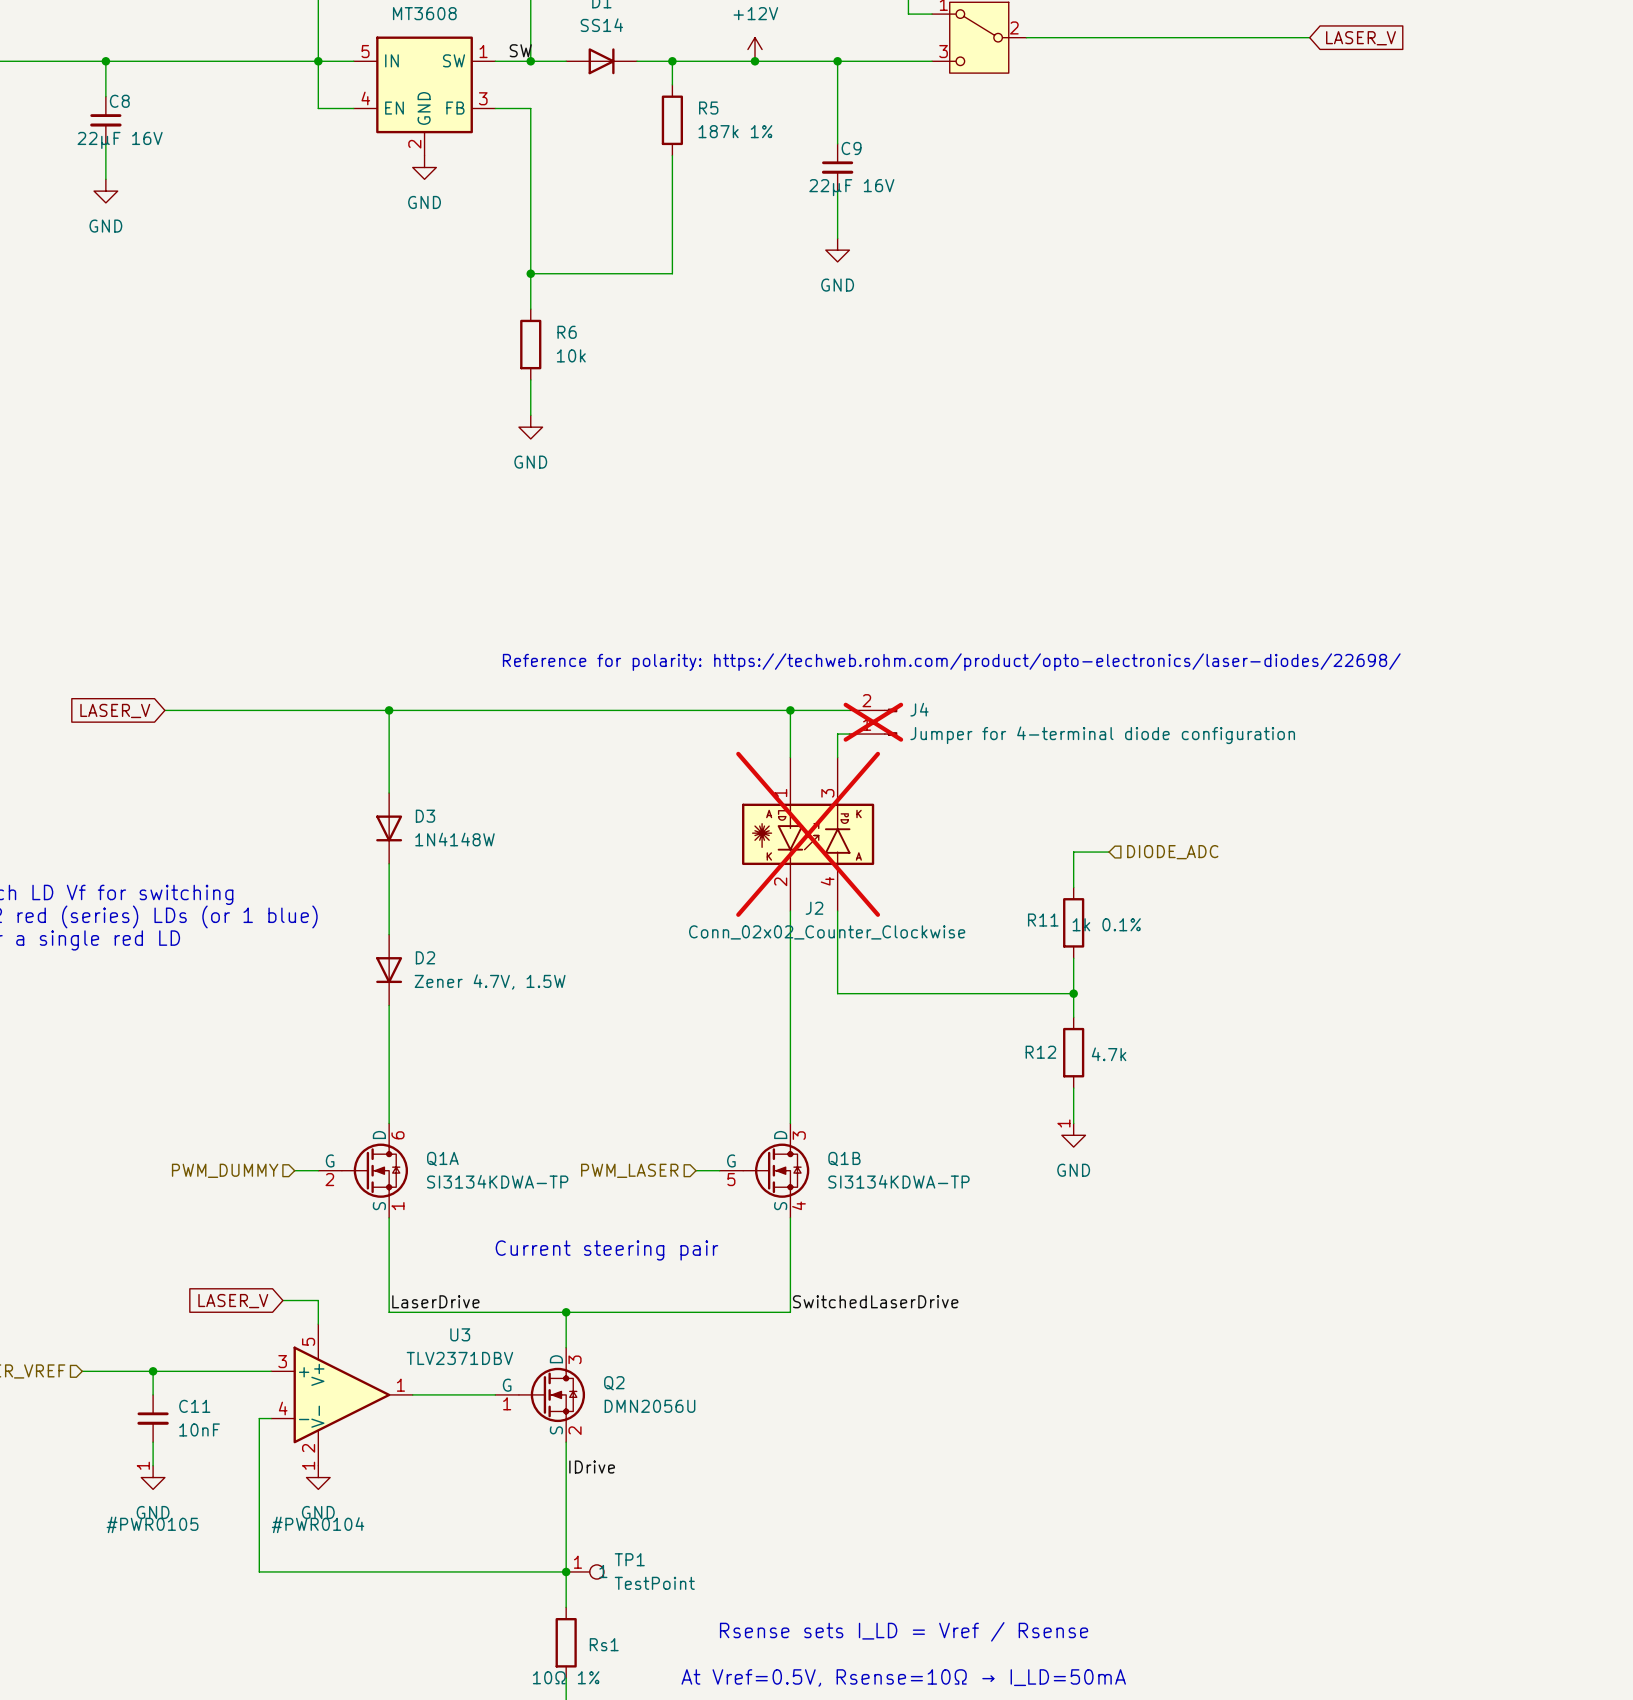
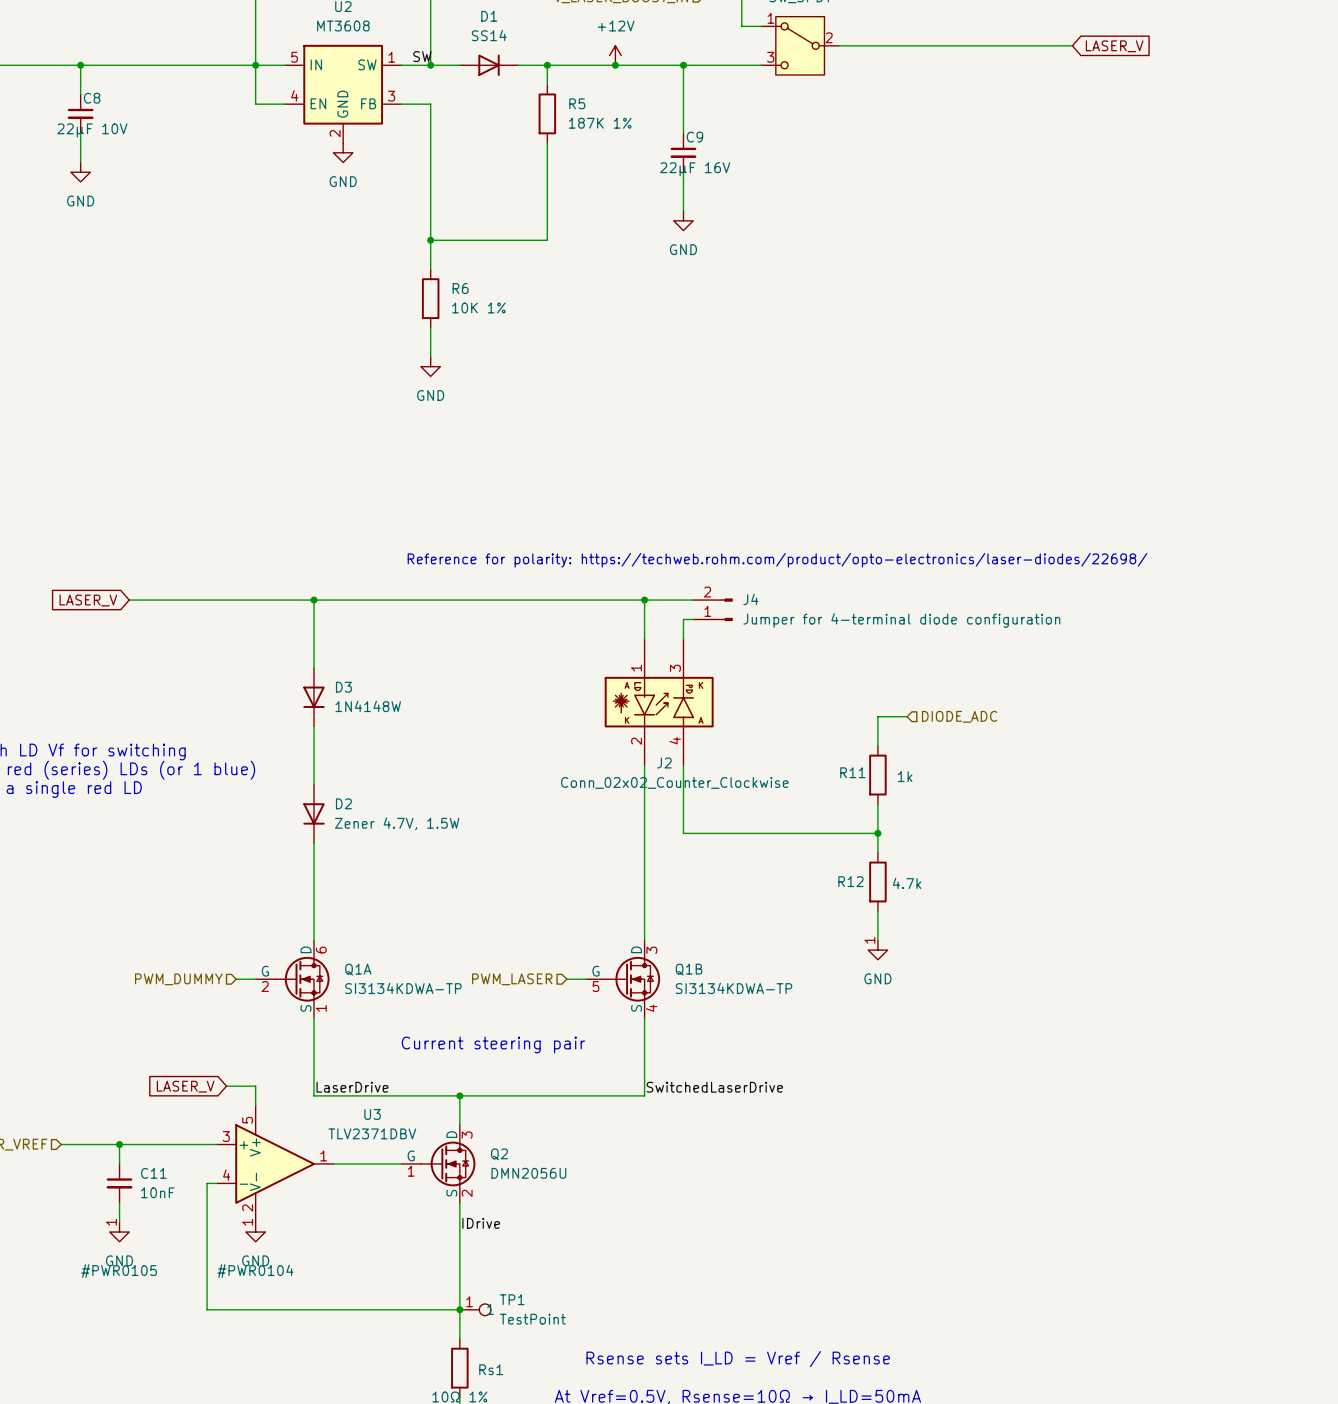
R5 value: 187k 1% (735, 131) -> 187K 1% (600, 123)
C8 value: 22µF 16V (120, 140) -> 22µF 10V (92, 130)
R6 value: 10k (571, 355) -> 10K 1% (478, 307)
J4 do-not-place cross: (873, 722) -> none
J2 do-not-place cross: (808, 834) -> none
R11 value: 1k 0.1% (1106, 924) -> 1k (905, 776)

